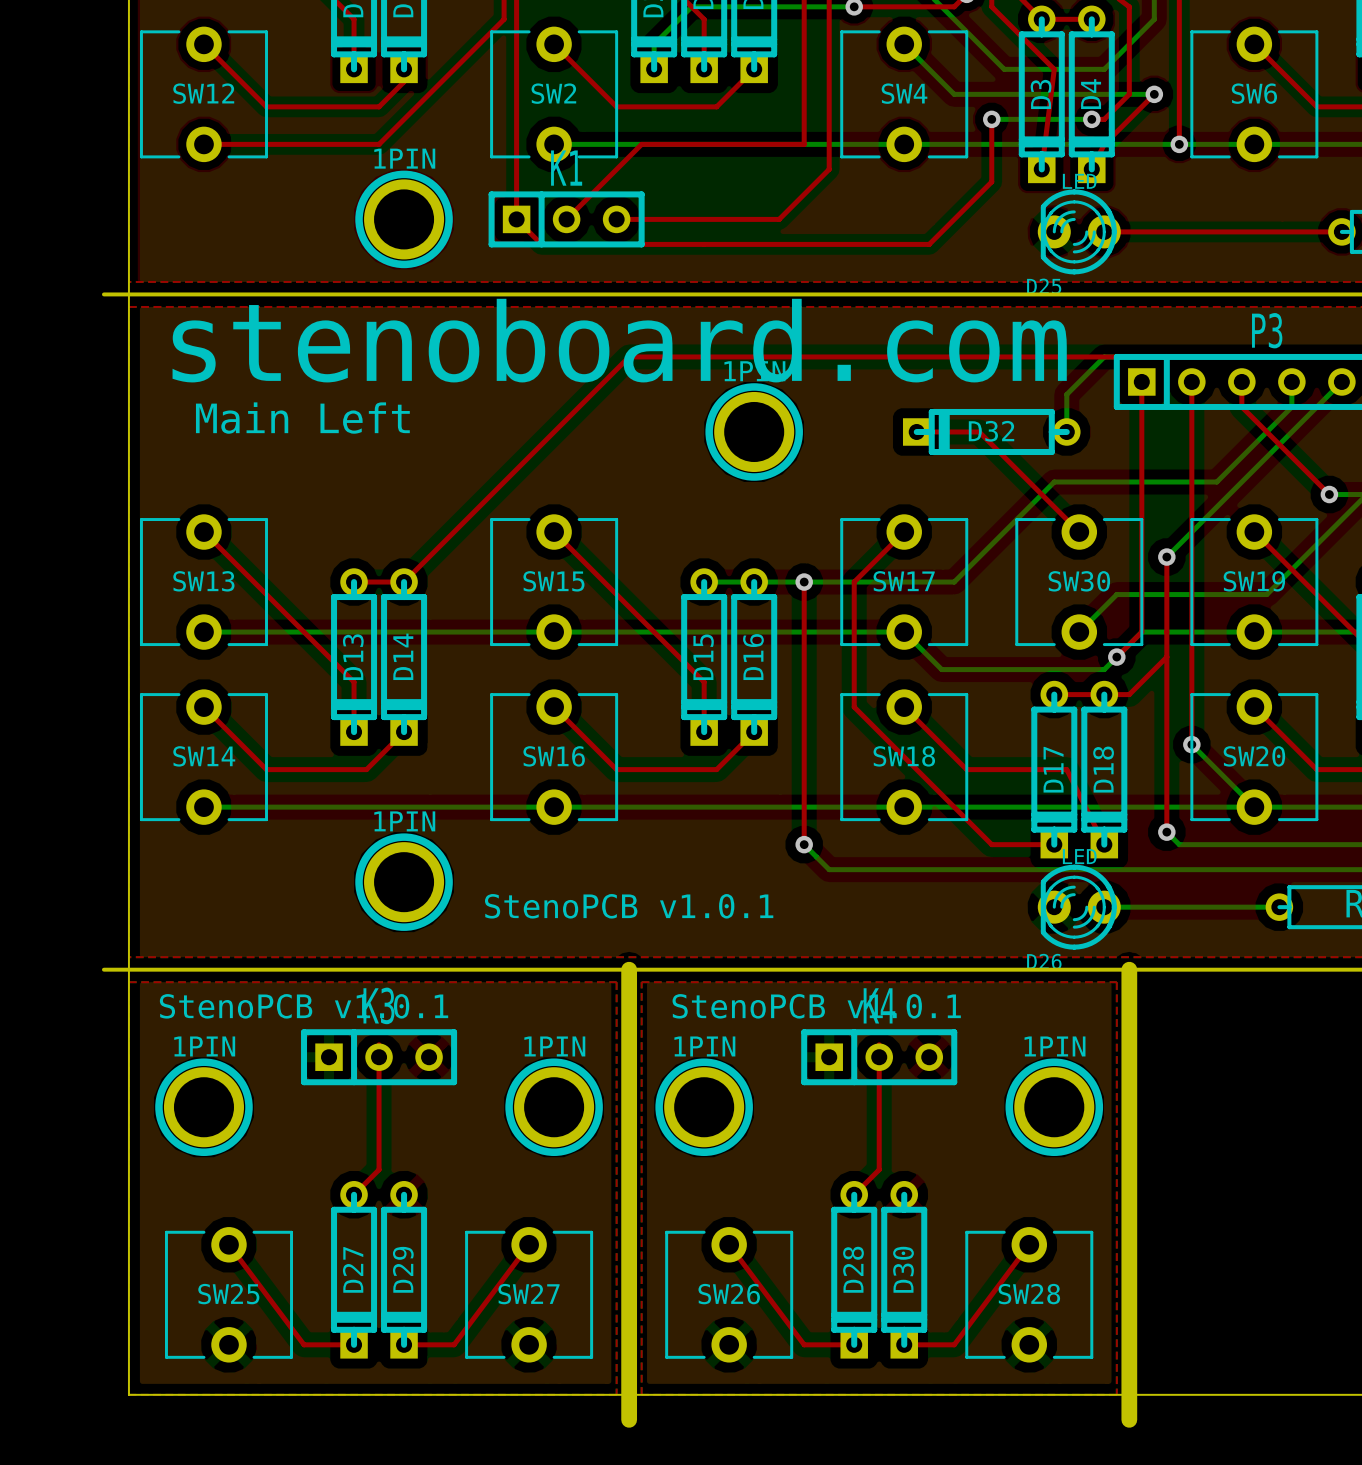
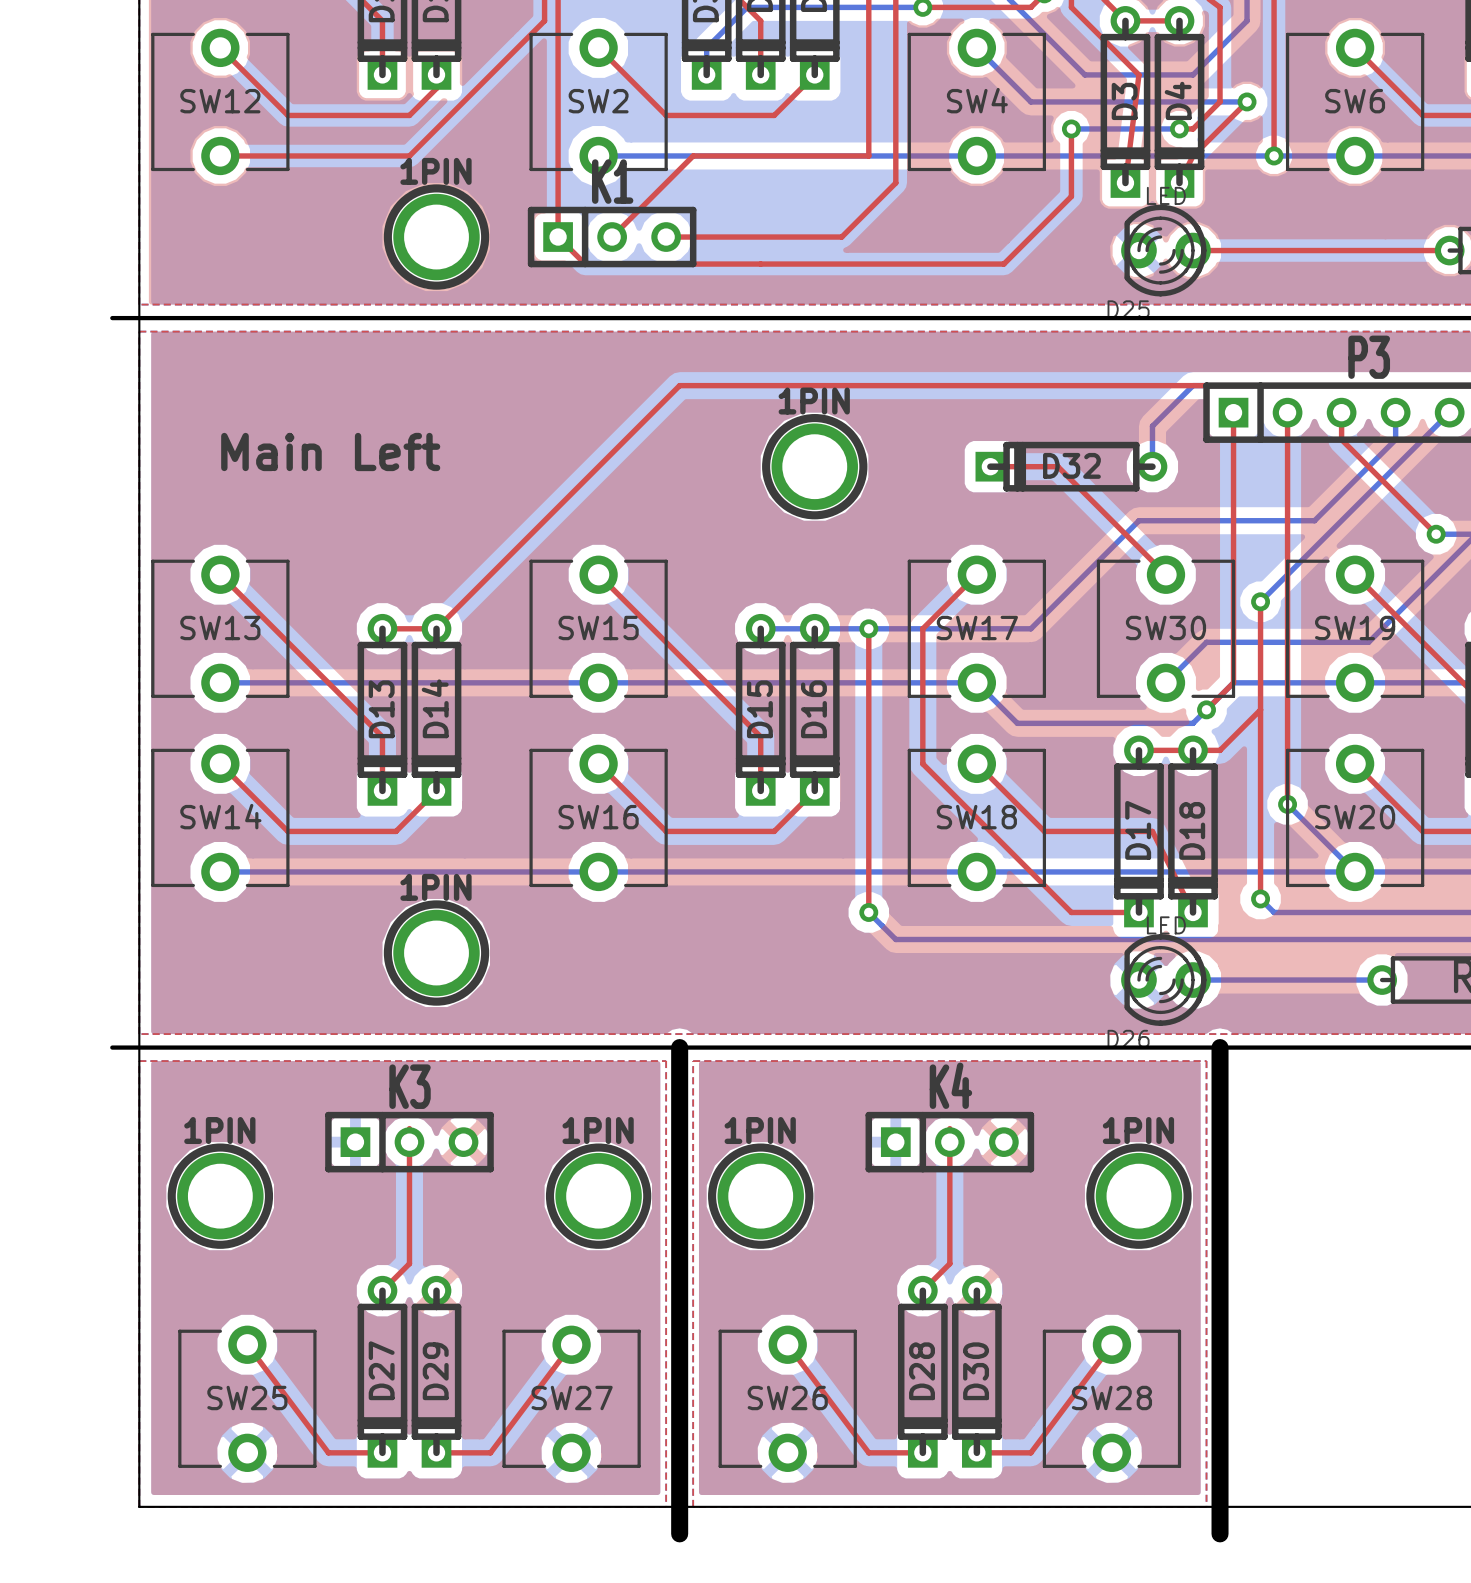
text: stenoboard.com (619, 340) -> none
text: StenoPCB v1.0.1 (629, 906) -> none
text: StenoPCB v1.0.1 (304, 1006) -> none
text: StenoPCB v1.0.1 (816, 1006) -> none

